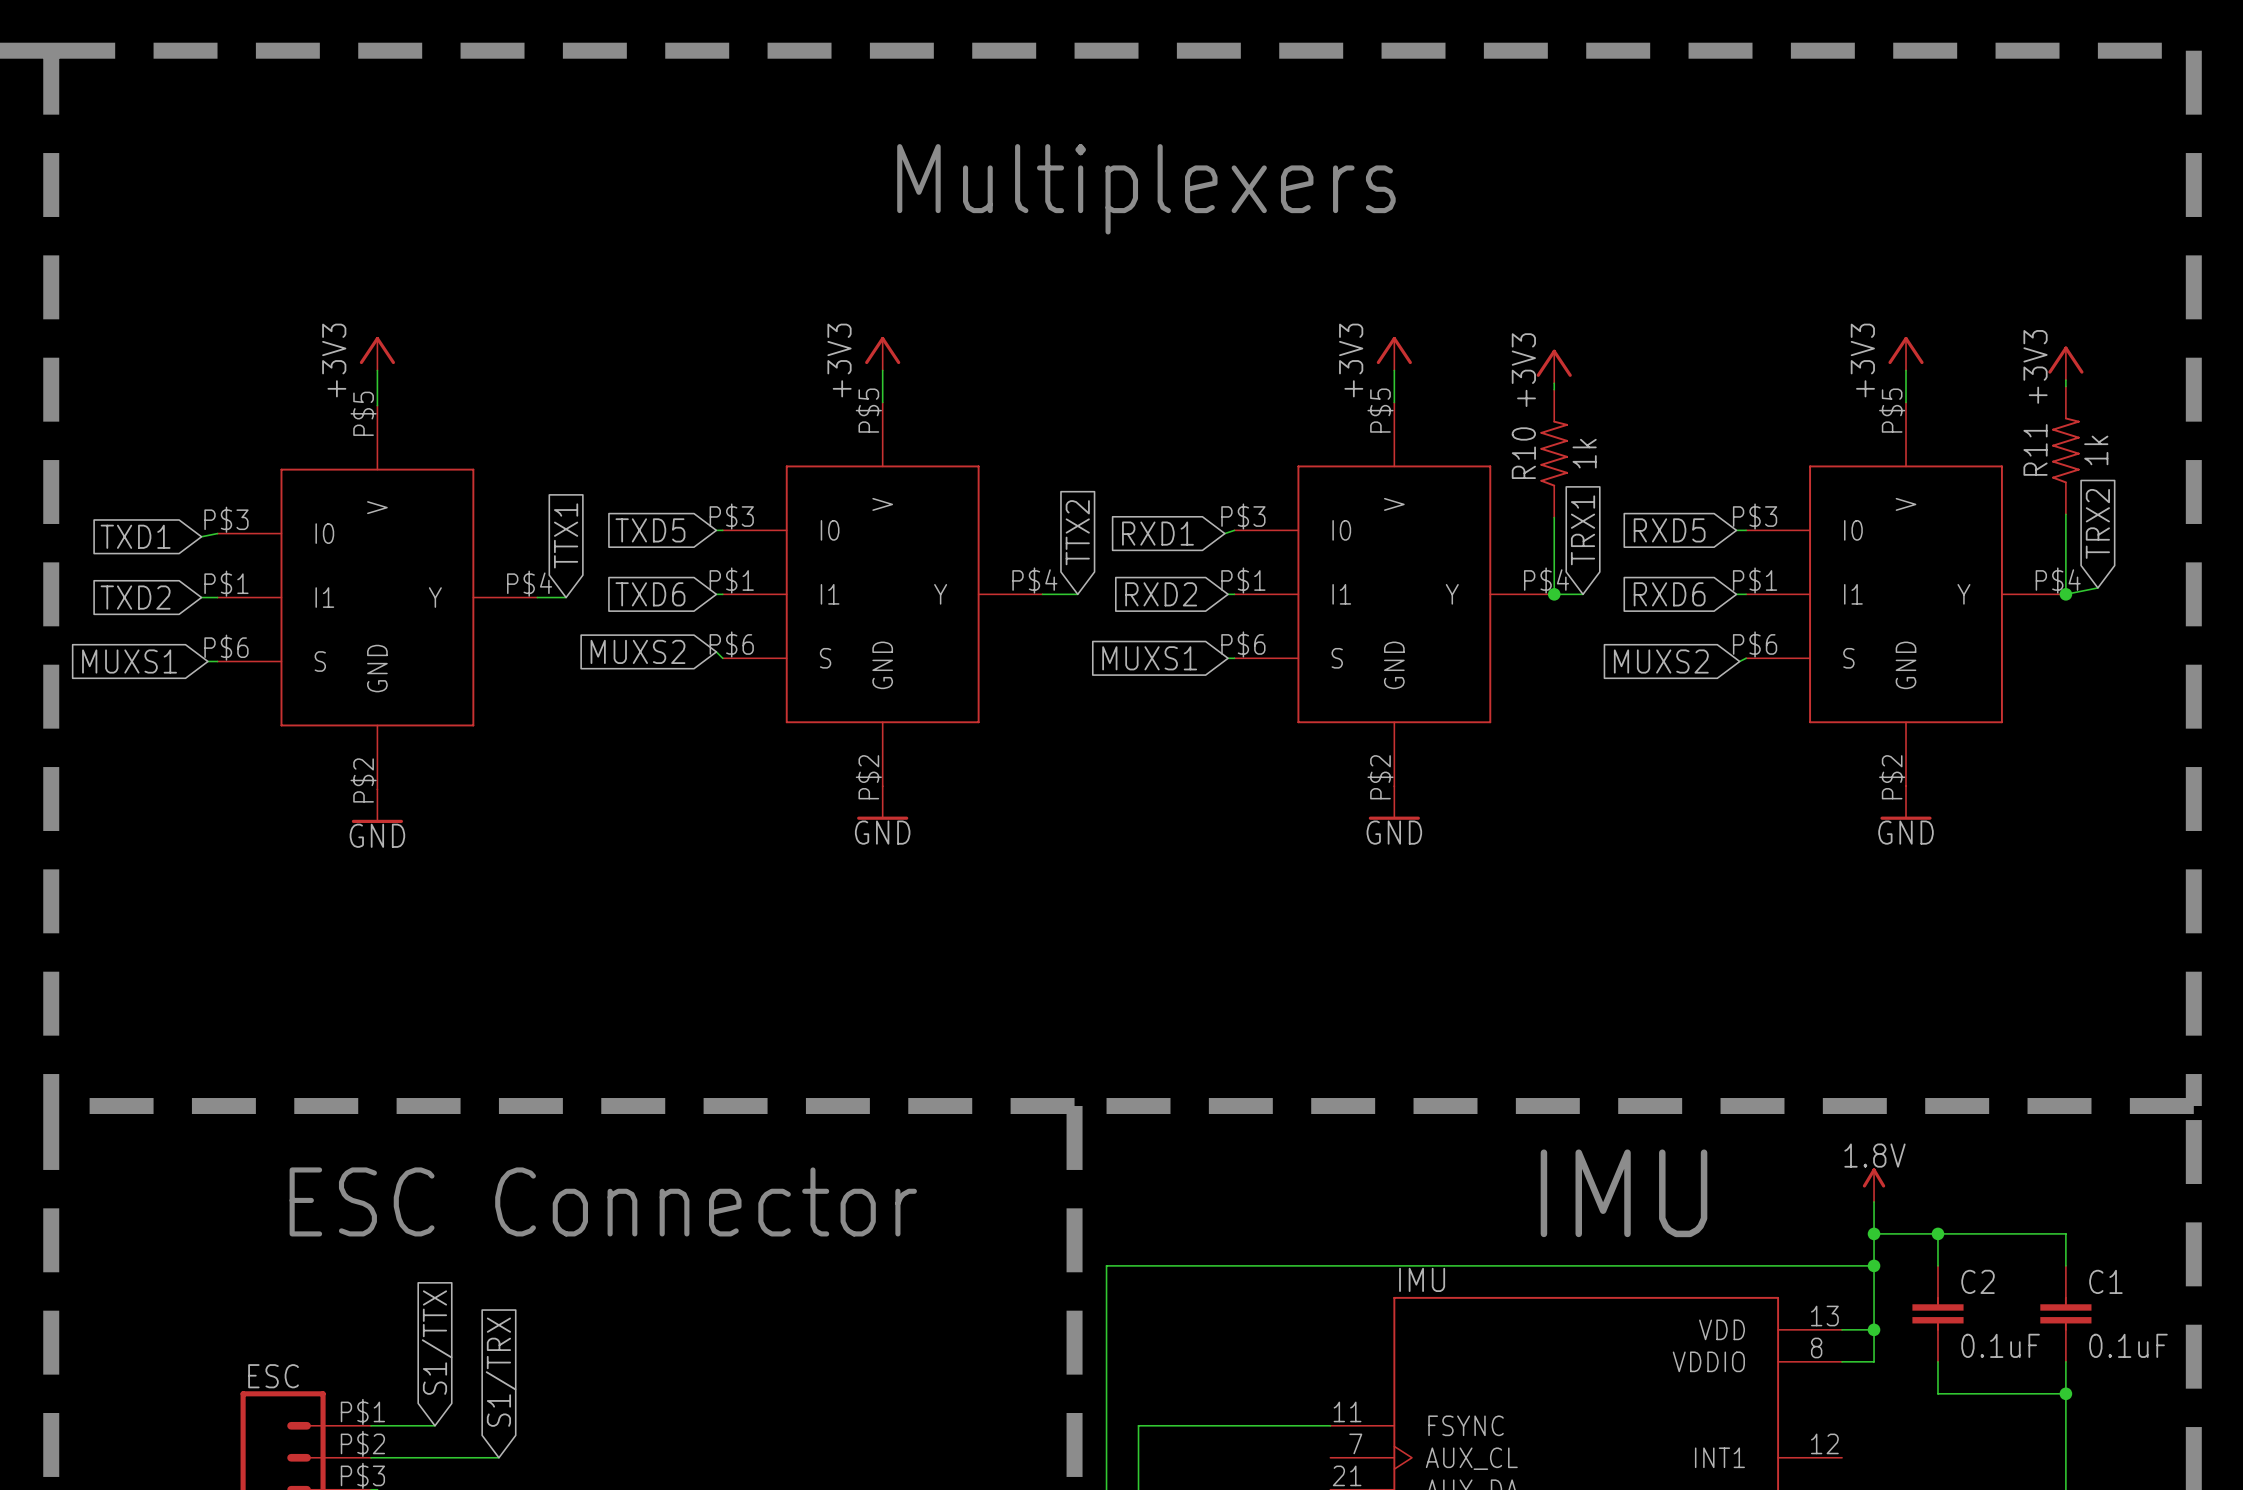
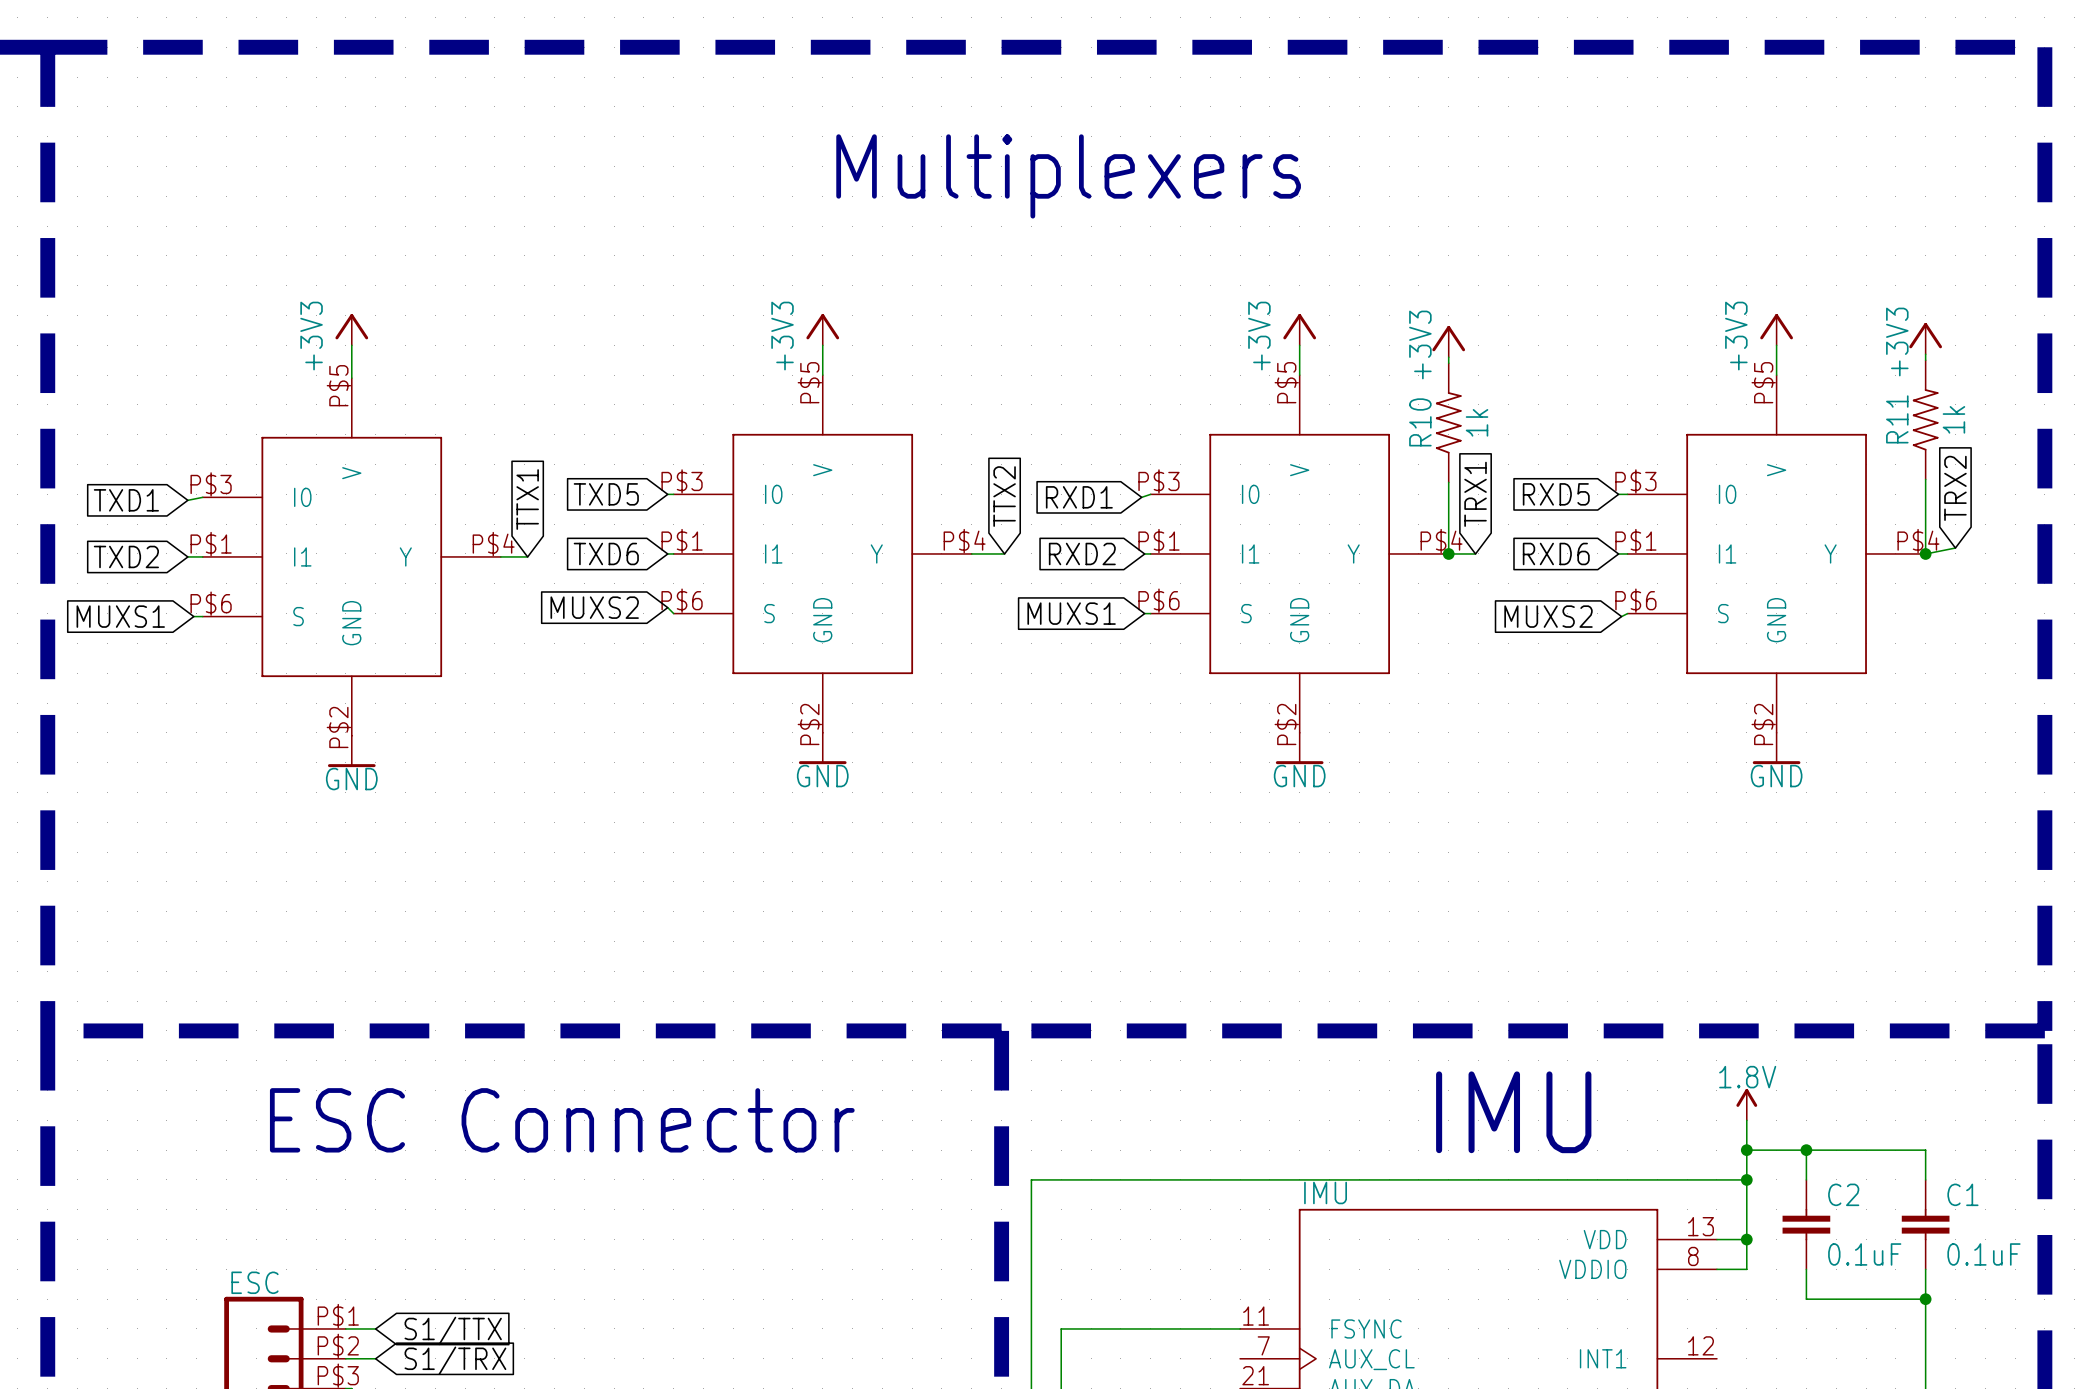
global label rotation: 0° (437, 1342) -> 90° clockwise (453, 1330)
global label rotation: 0° (501, 1372) -> 90° clockwise (455, 1360)
wire: (403, 1425) (434, 1425) -> none
wire: (403, 1457) (498, 1457) -> none

